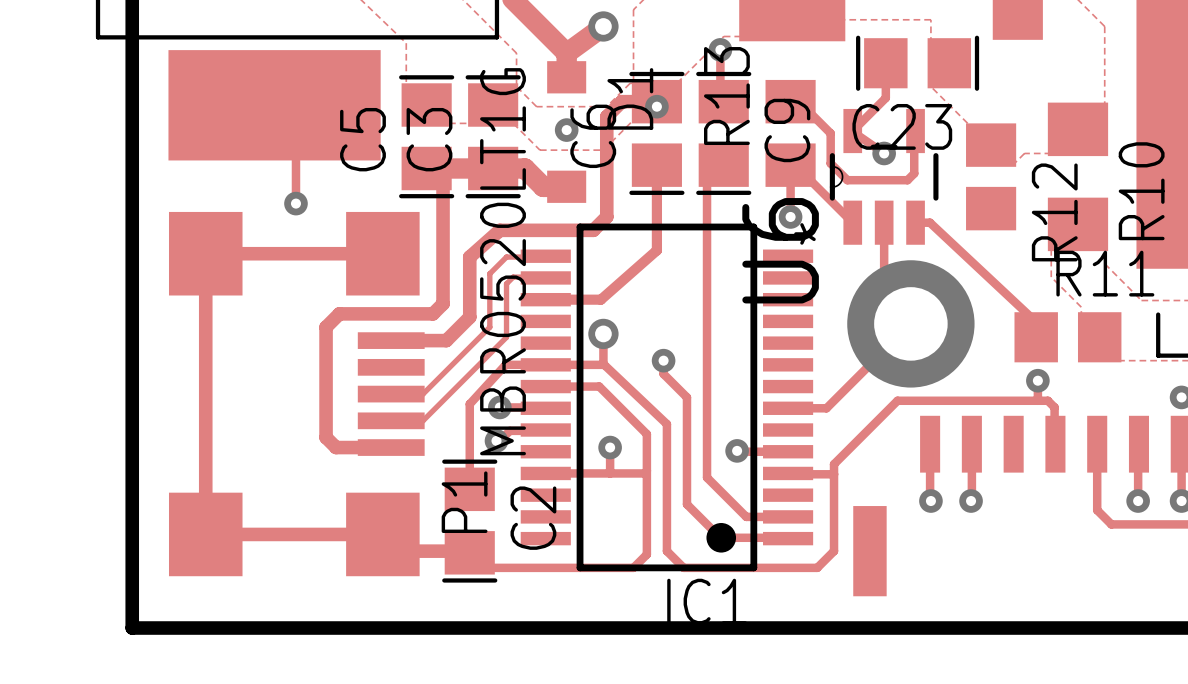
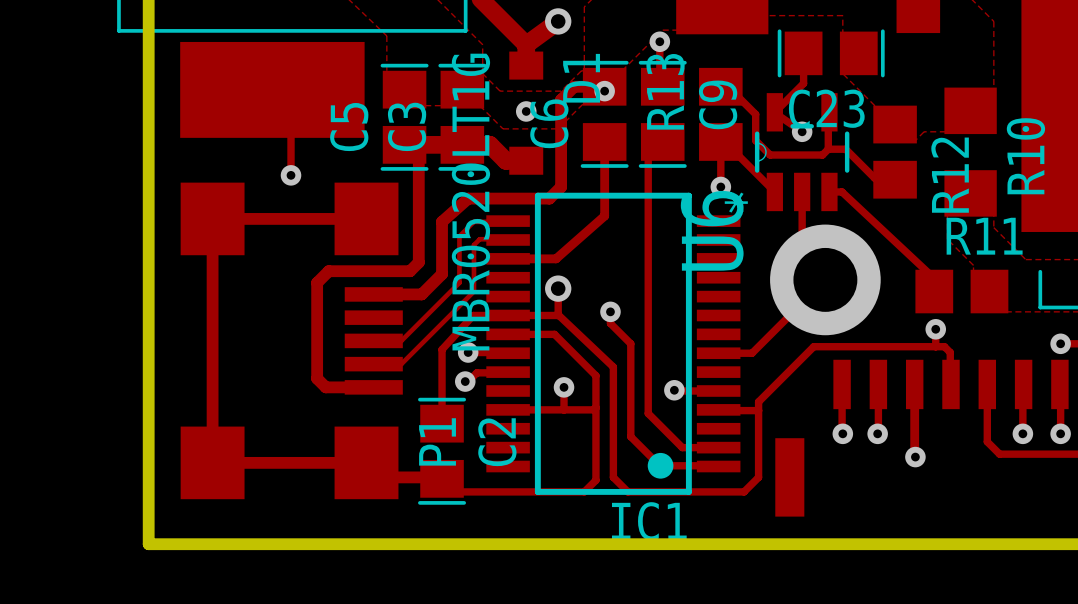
track: none -> (828, 149) (845, 149) (874, 178) (895, 179)
track: none -> (914, 384) (915, 457)
via: none -> (915, 457)

